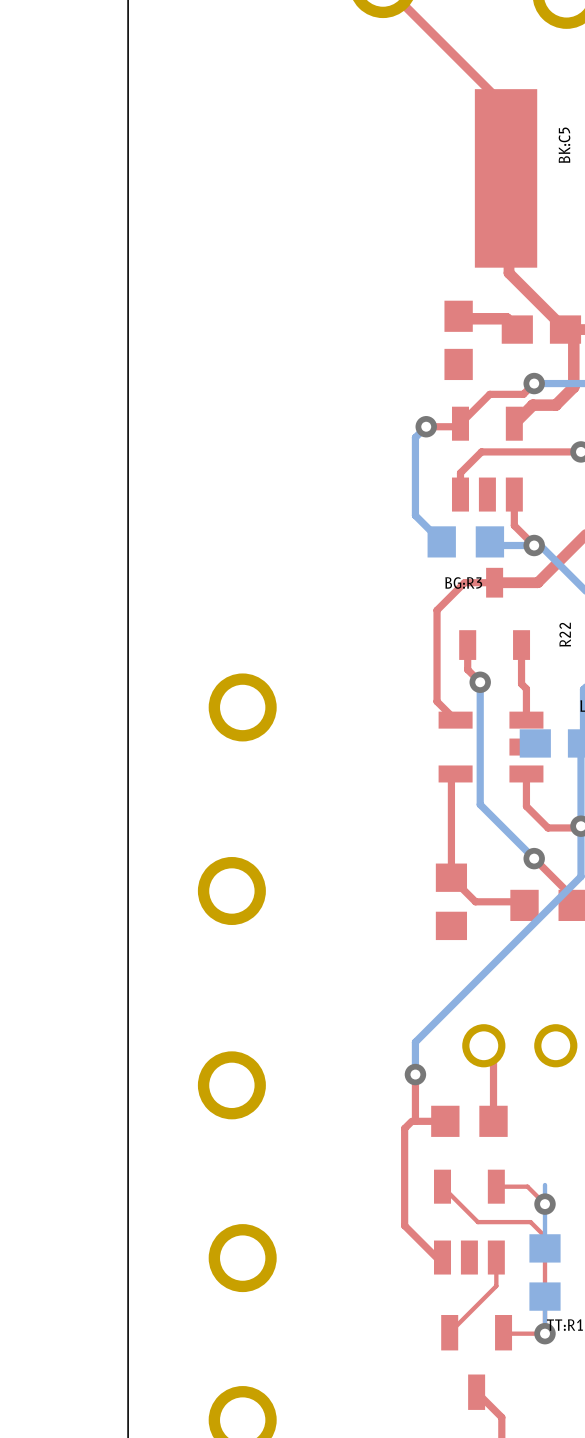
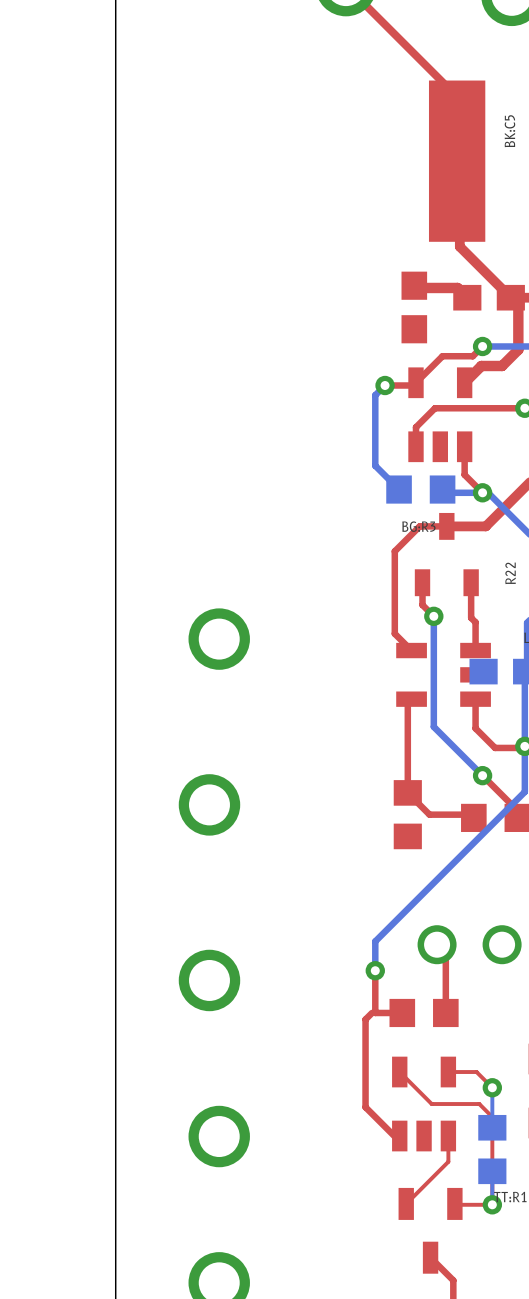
bottom track: (545, 1185) (545, 1204) -> none

